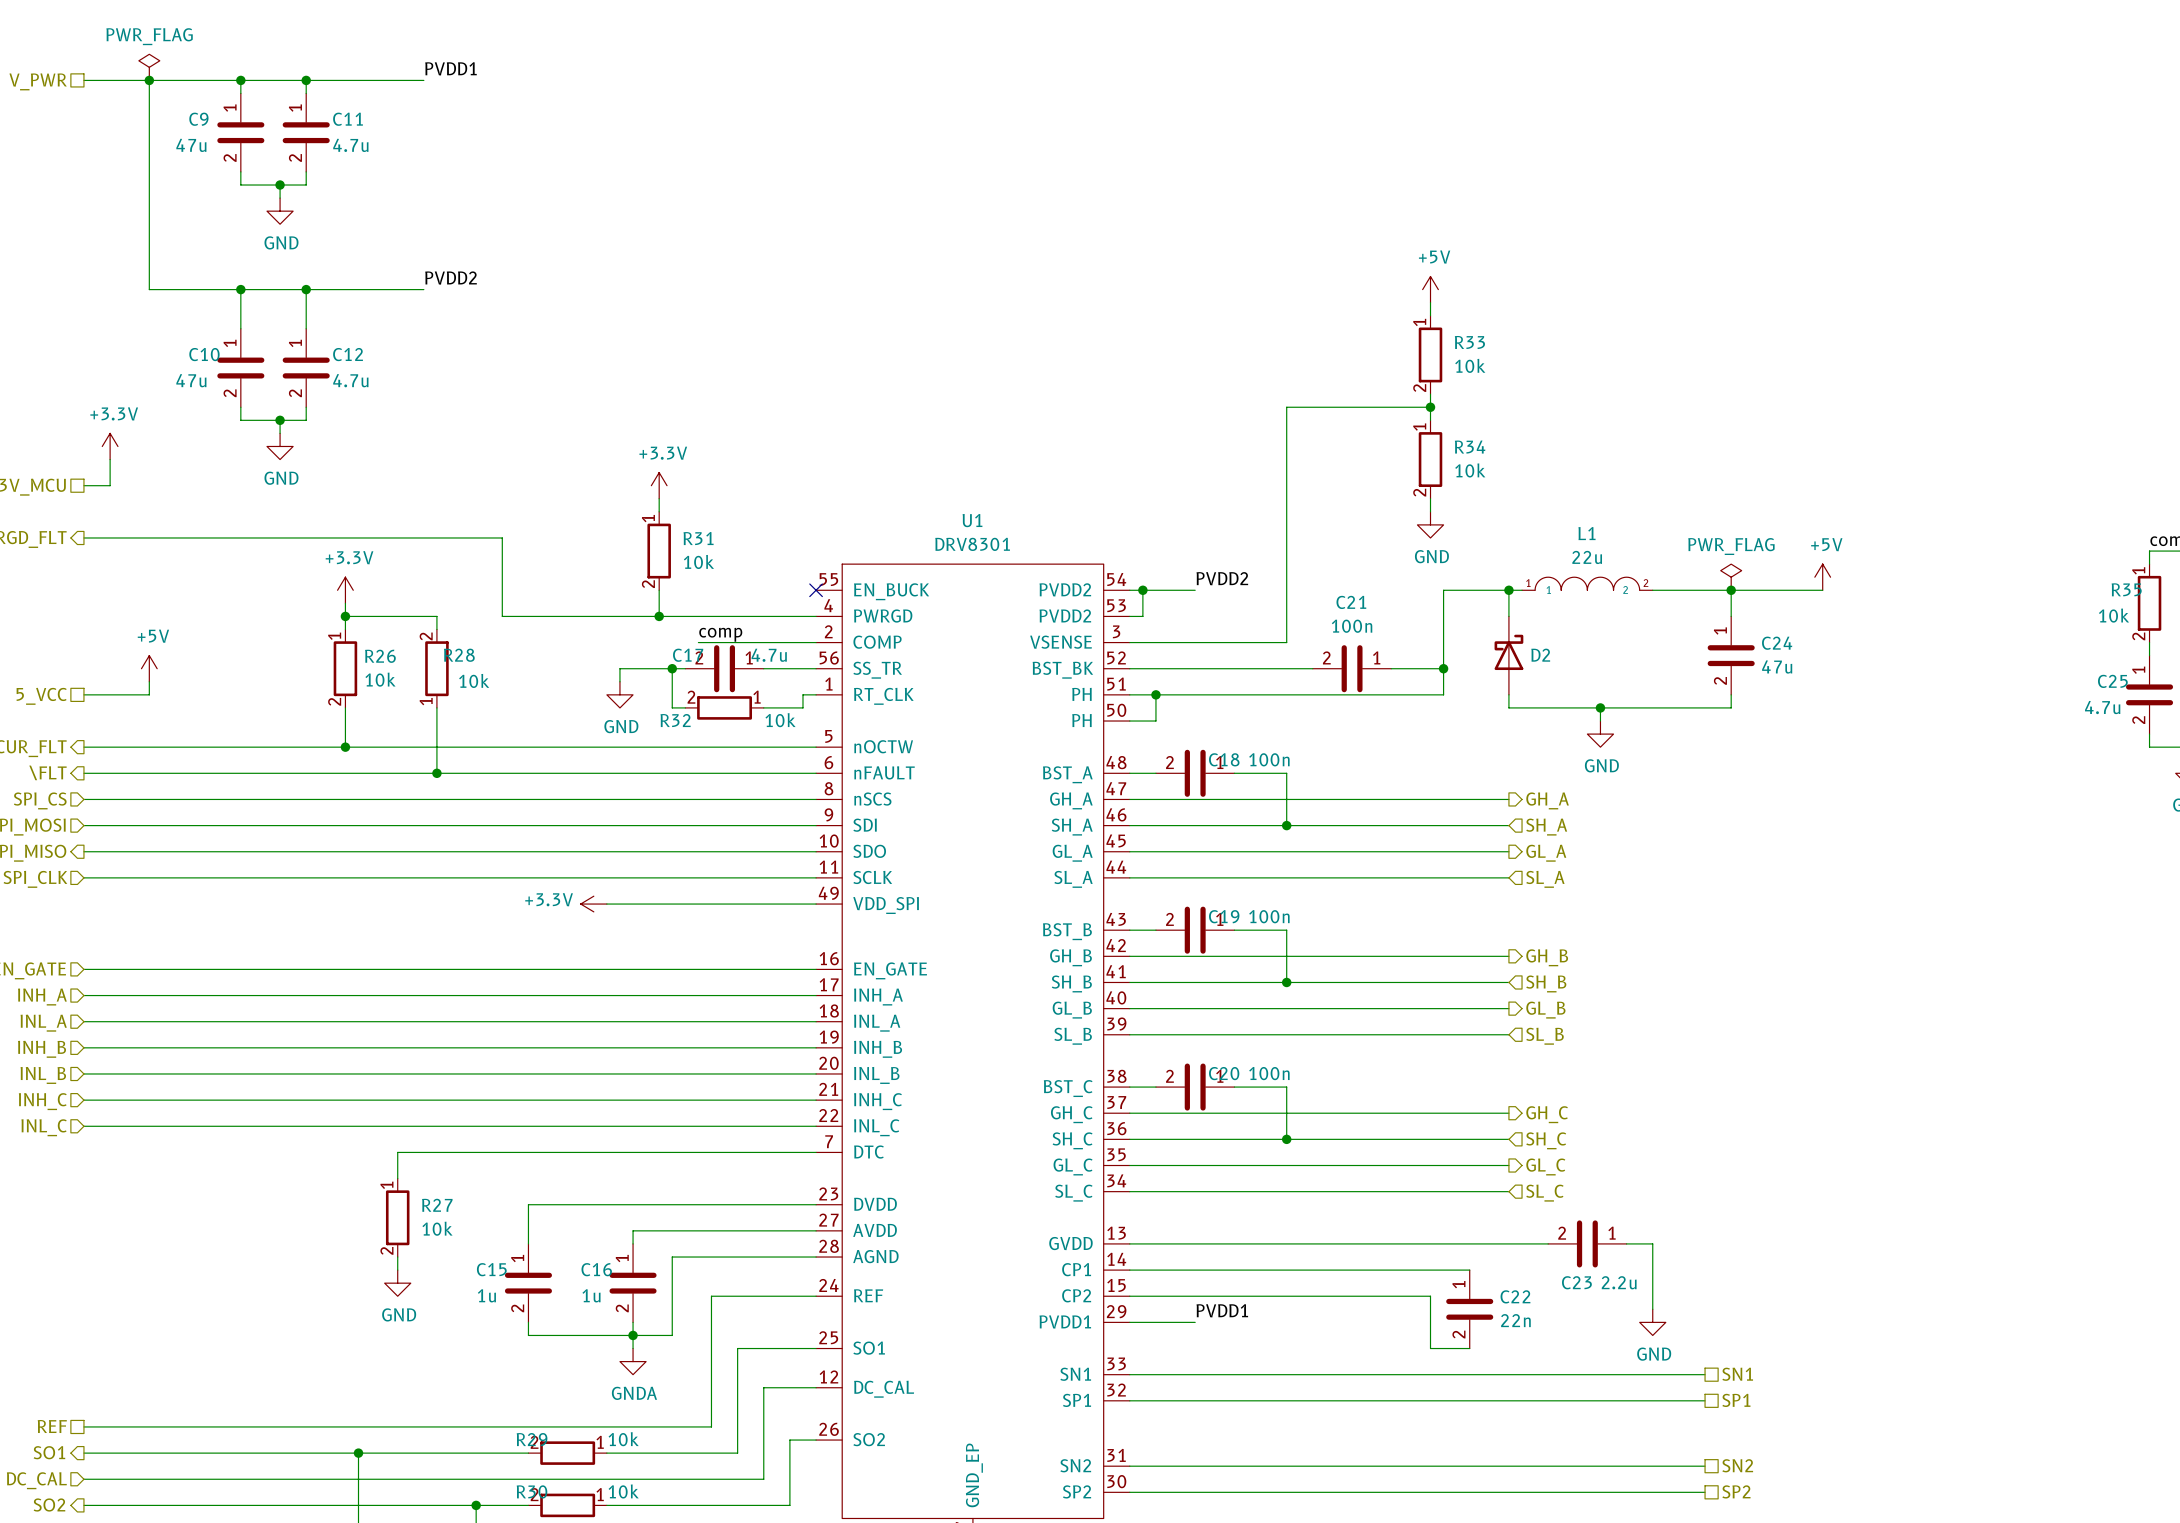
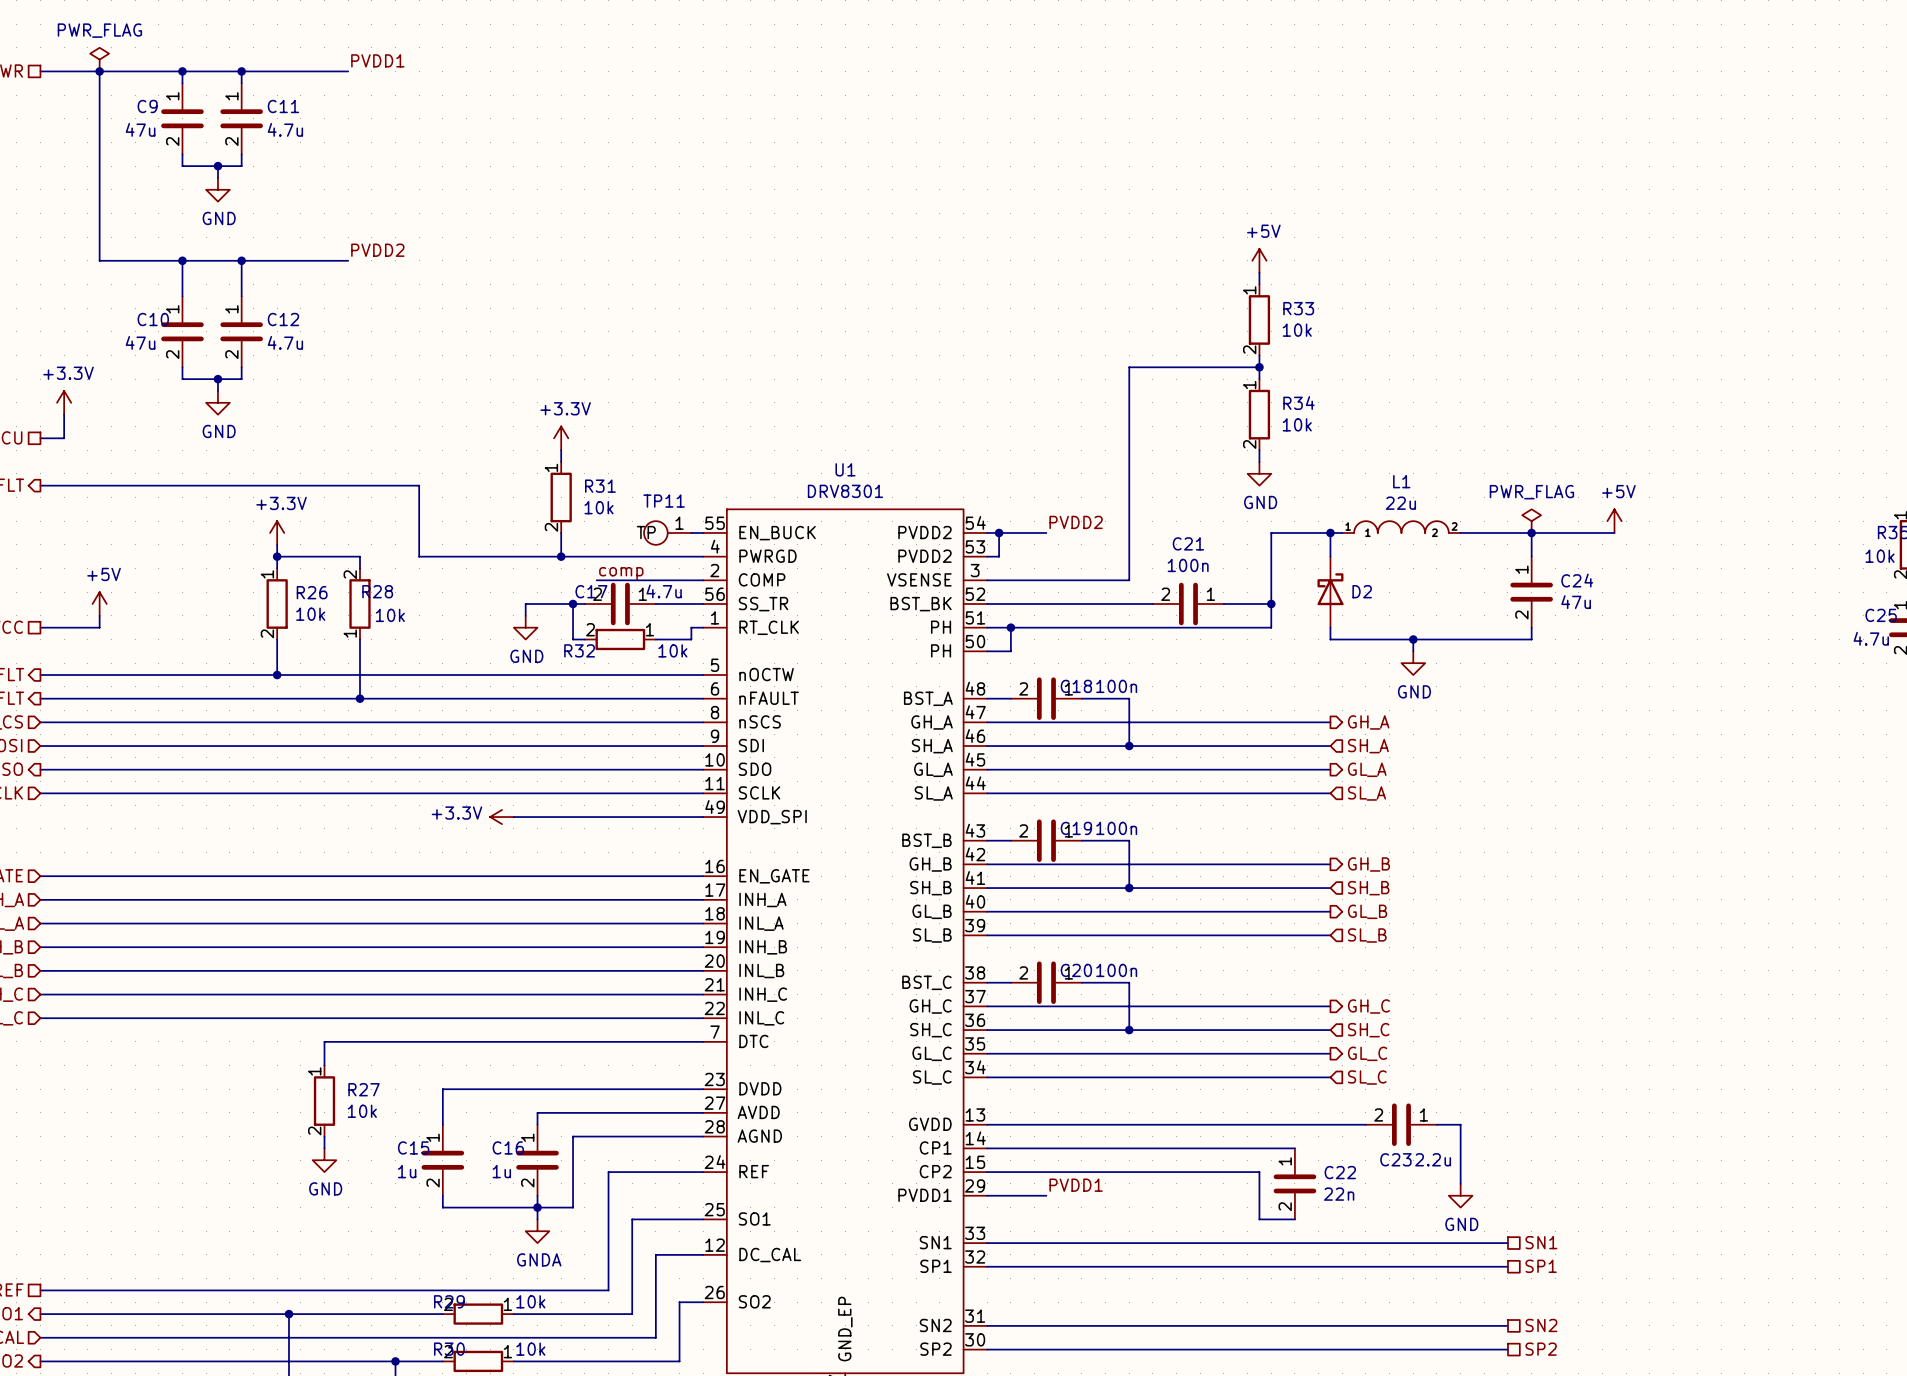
TP11: none -> (667, 532)
wire: none -> (691, 532) (703, 532)
no-connect mark: (816, 590) -> none

